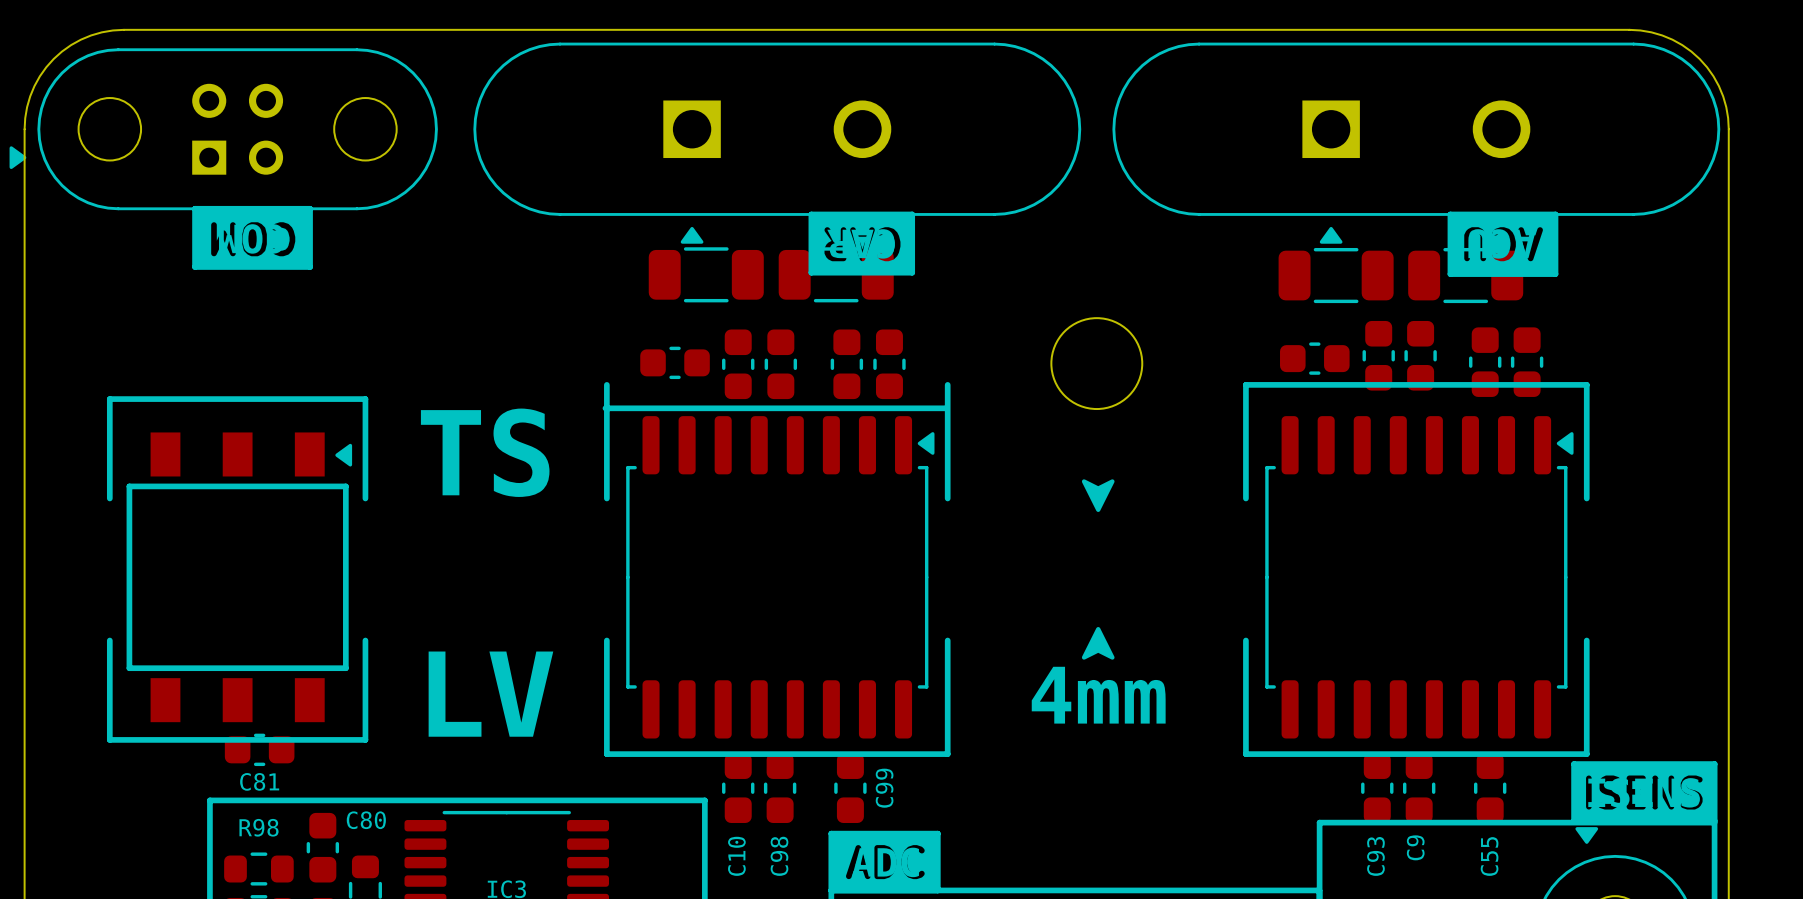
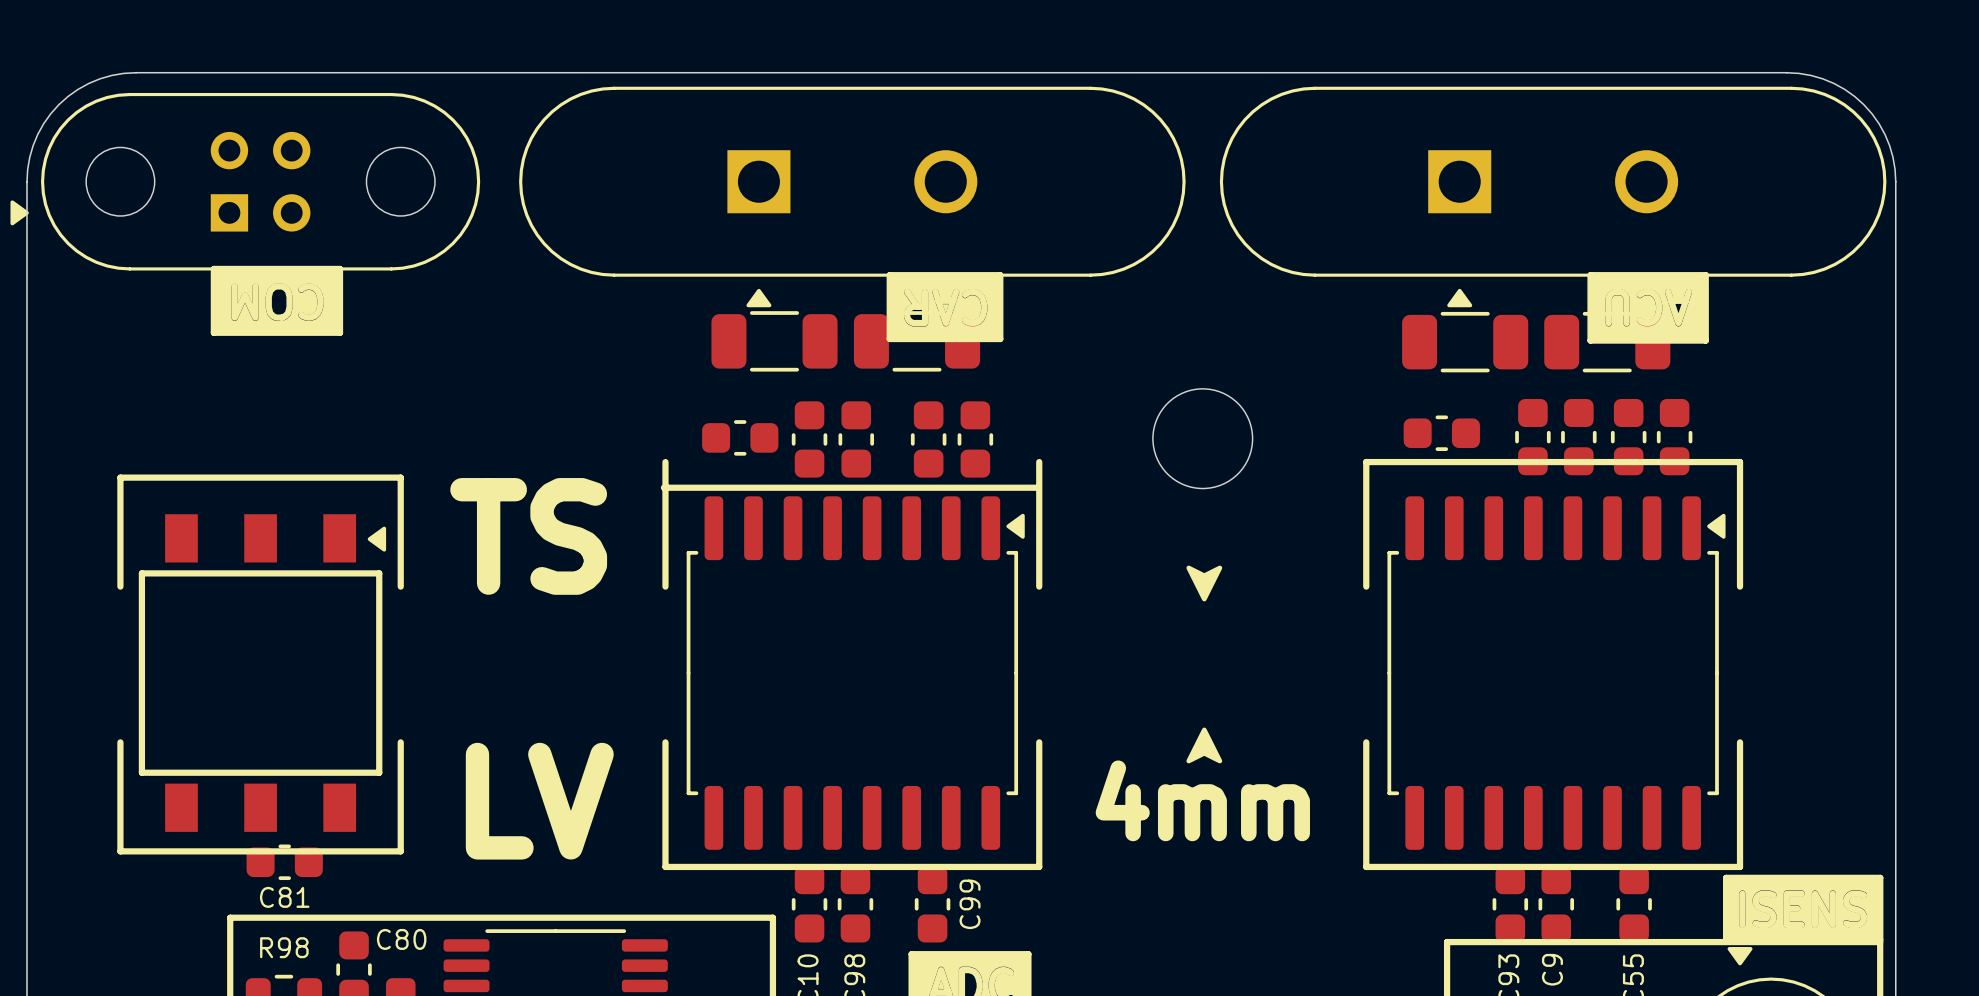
part: (1378, 355) -> none
part: (1420, 355) -> none
part: none -> (1532, 437)
part: none -> (1578, 437)

